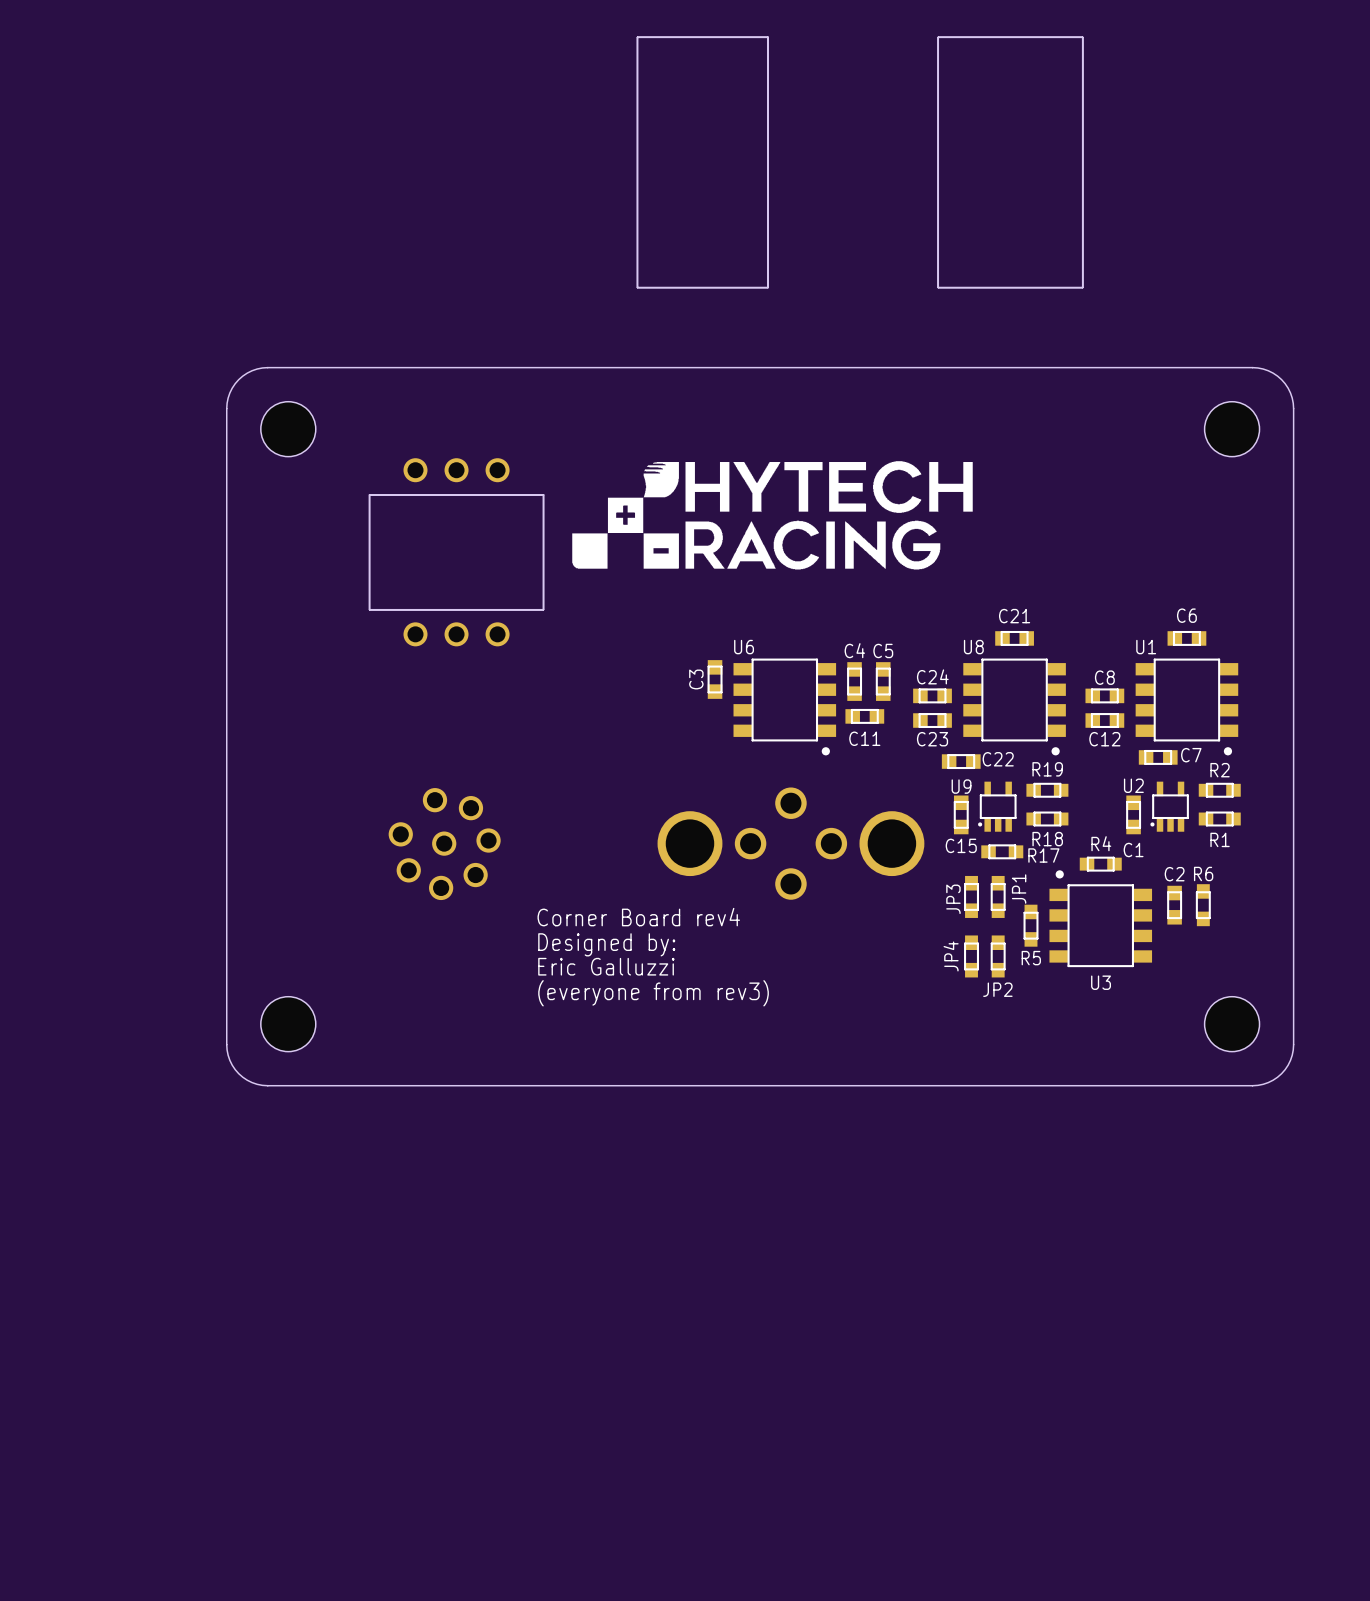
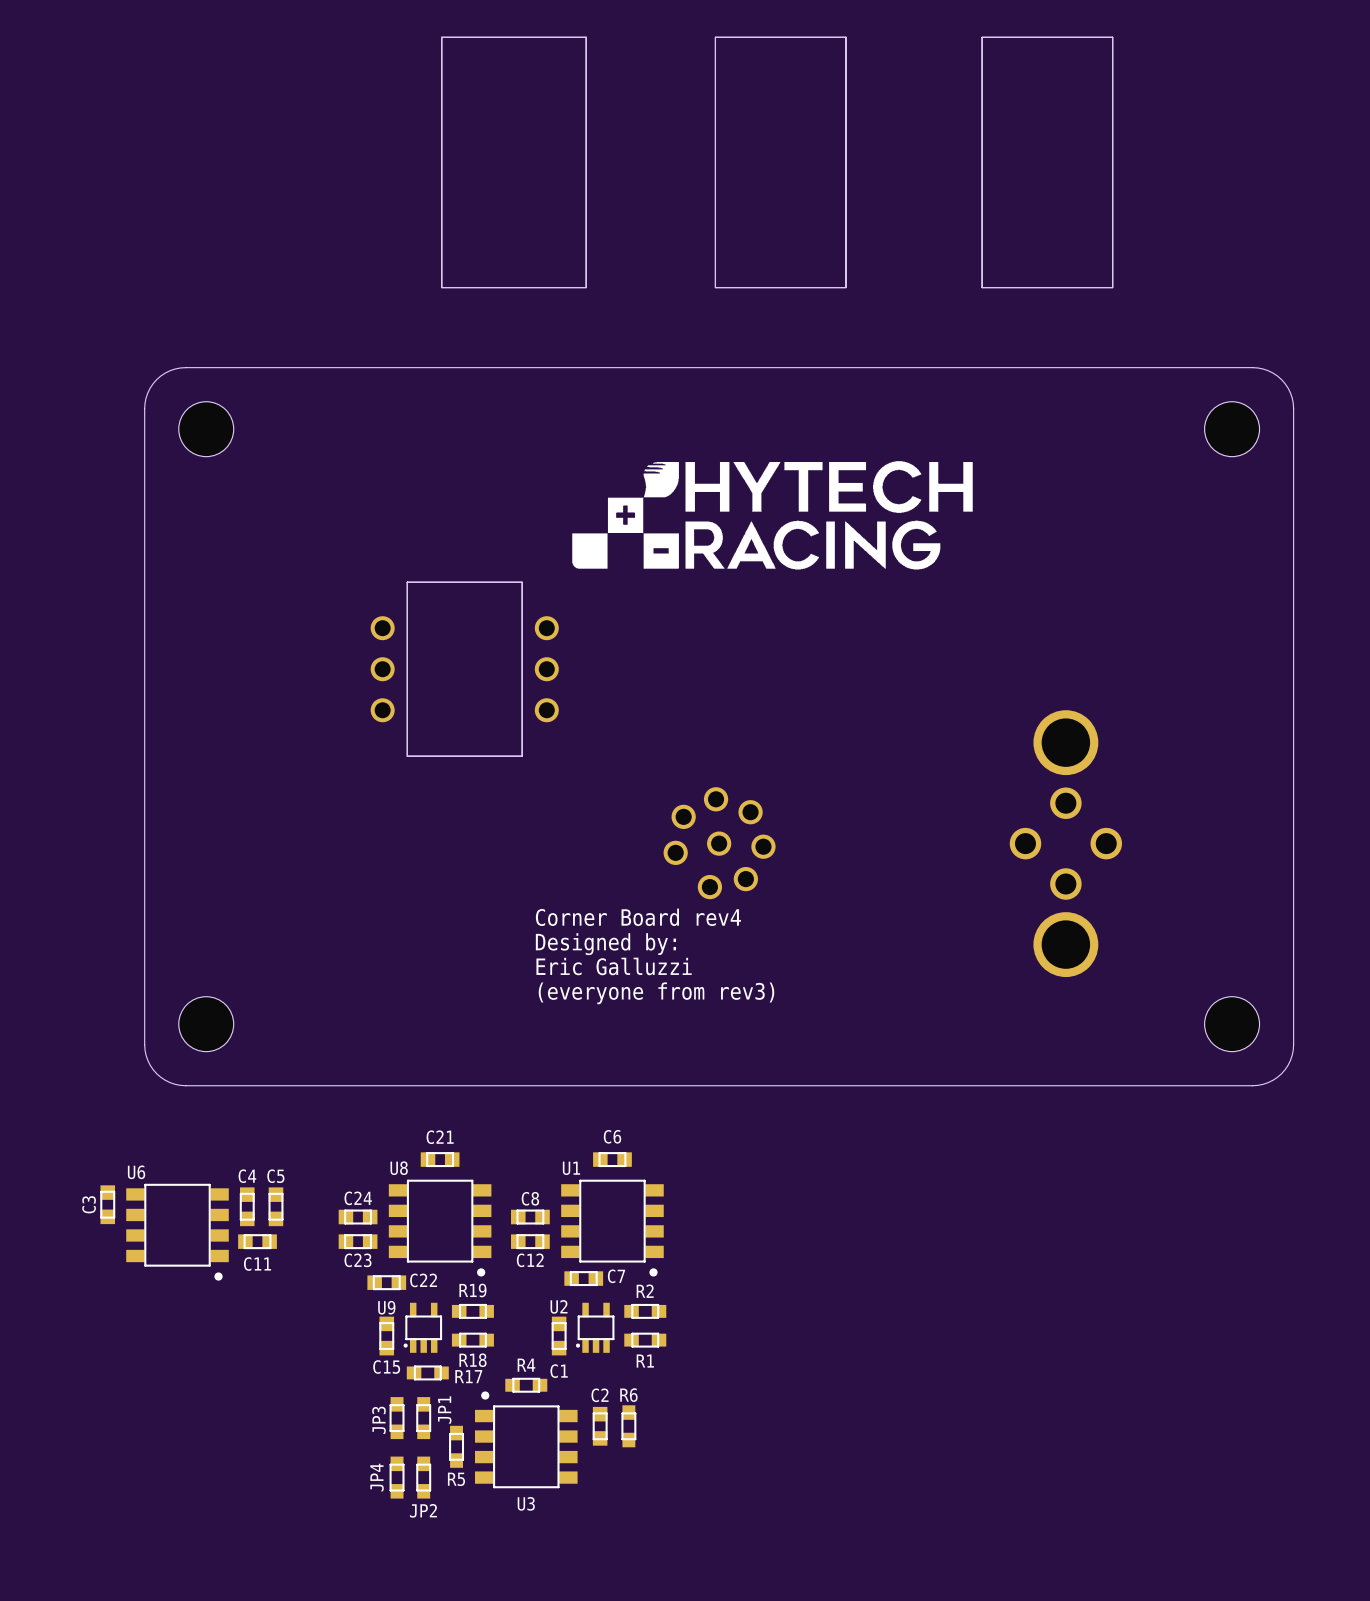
part: none -> (513, 162)
part position: (702, 162) -> (780, 162)
part: (1010, 162) -> none
part: none -> (1047, 162)
board edge: (267, 367) (252, 370) (238, 379) (229, 392) (226, 408) (226, 1044) (229, 1060) (238, 1073) (252, 1082) (267, 1085) -> (267, 367) (175, 369) (160, 376) (153, 383) (146, 398) (144, 408) (145, 1050) (147, 1060) (156, 1073) (175, 1084) (267, 1085)
part position: (288, 429) -> (206, 429)
part rotation: 0° (456, 552) -> 90° clockwise (464, 669)
part position: (456, 552) -> (464, 669)
C21 position: (1014, 638) -> (440, 1159)
C6 position: (1186, 638) -> (612, 1159)
C3 position: (715, 679) -> (107, 1204)
C4 position: (854, 681) -> (247, 1206)
C5 position: (883, 681) -> (275, 1206)
C24 position: (932, 695) -> (358, 1217)
C8 position: (1104, 695) -> (530, 1217)
U6 position: (784, 706) -> (177, 1232)
U8 position: (1014, 706) -> (440, 1228)
U1 position: (1186, 706) -> (612, 1228)
C11 position: (864, 716) -> (257, 1241)
C23 position: (932, 720) -> (358, 1241)
C12 position: (1104, 720) -> (530, 1241)
C7 position: (1158, 757) -> (583, 1278)
C22 position: (961, 761) -> (386, 1282)
R19 position: (1047, 790) -> (472, 1311)
R2 position: (1219, 790) -> (645, 1311)
U9 position: (997, 806) -> (422, 1327)
U2 position: (1169, 806) -> (595, 1327)
C15 position: (961, 814) -> (386, 1336)
C1 position: (1133, 814) -> (559, 1336)
R18 position: (1047, 819) -> (472, 1340)
R1 position: (1219, 819) -> (645, 1340)
part rotation: 0° (790, 843) -> 90° clockwise (1065, 843)
part position: (790, 843) -> (1065, 843)
part rotation: 0° (444, 844) -> 90° counterclockwise (719, 843)
part position: (444, 844) -> (719, 843)
R17 position: (1002, 851) -> (427, 1372)
R4 position: (1100, 864) -> (526, 1385)
JP3 position: (971, 896) -> (397, 1418)
JP1 position: (998, 896) -> (423, 1418)
C2 position: (1174, 905) -> (600, 1426)
R6 position: (1203, 905) -> (628, 1426)
U3 position: (1100, 918) -> (526, 1439)
R5 position: (1031, 925) -> (456, 1446)
JP4 position: (971, 956) -> (397, 1477)
JP2 position: (998, 956) -> (423, 1477)
part position: (288, 1024) -> (206, 1024)

